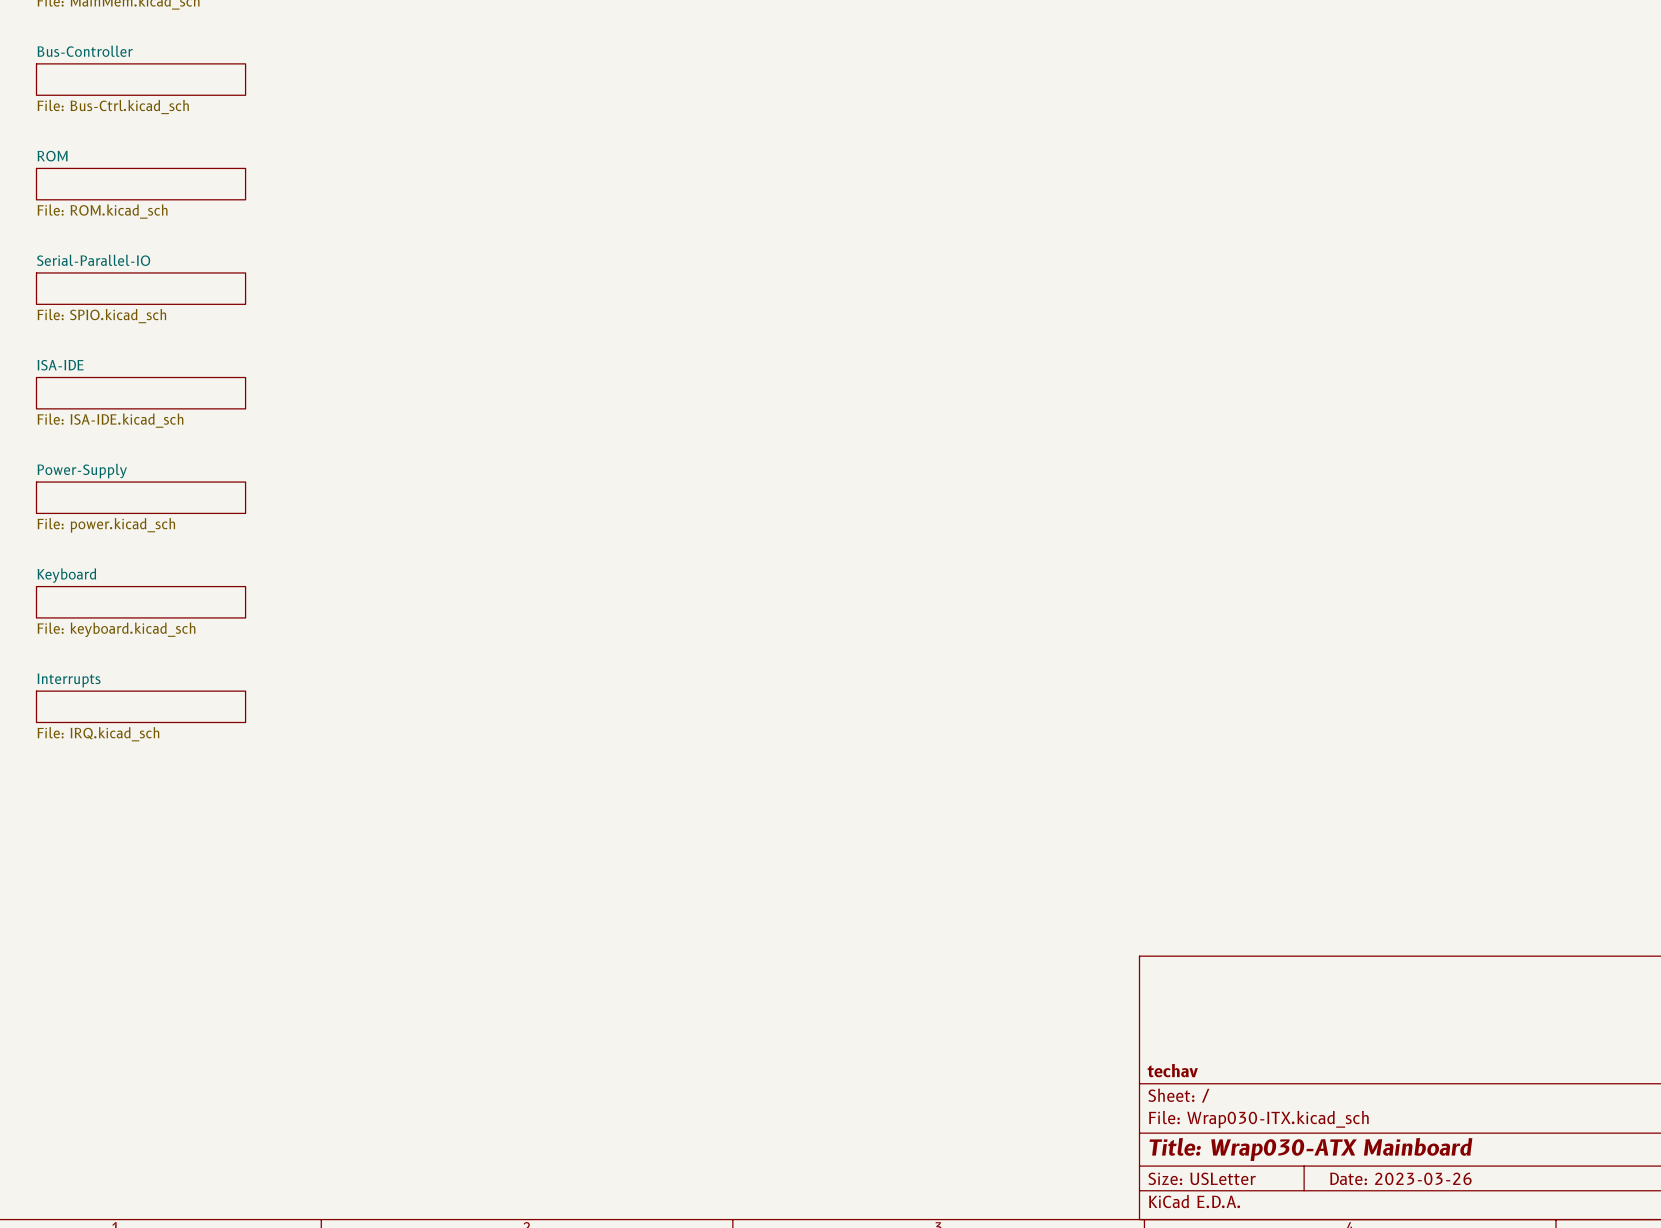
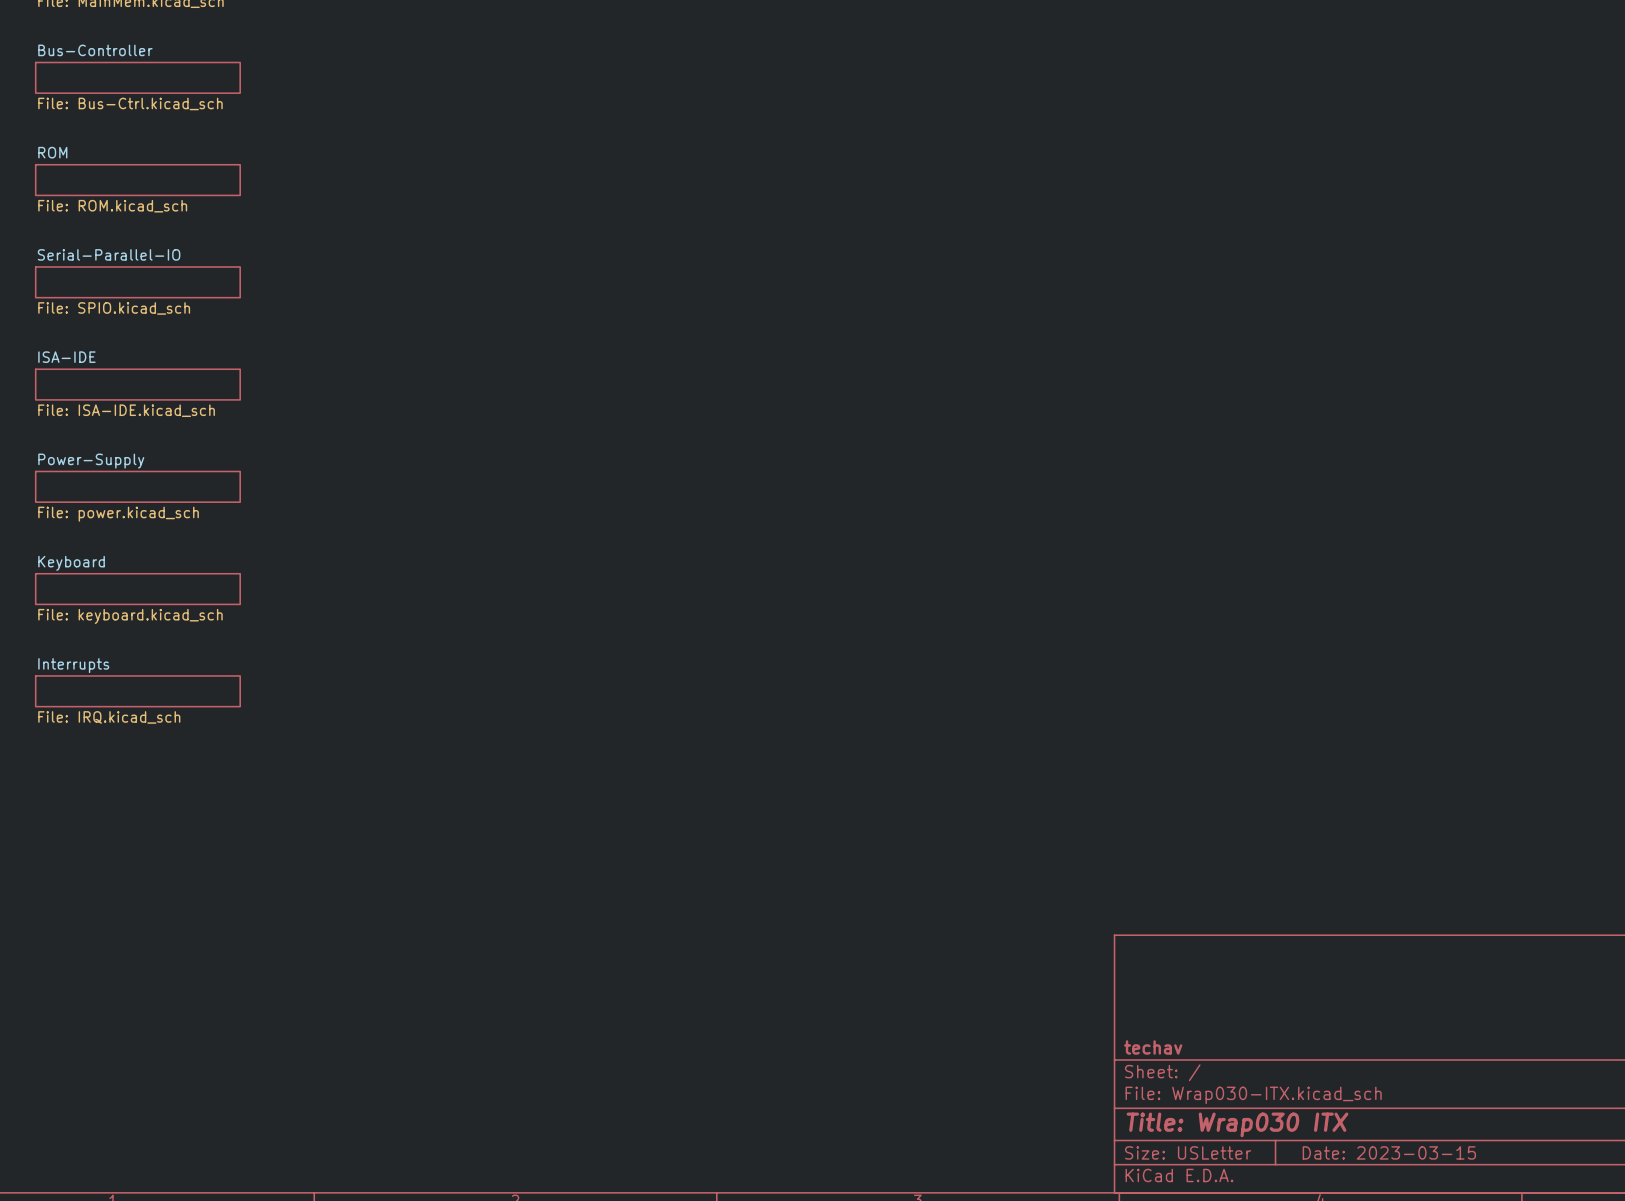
title block: Title: Wrap030-ATX Mainboard (1310, 1149) -> Title: Wrap030 ITX (1237, 1124)
title block: Date: 2023-03-26 (1400, 1178) -> Date: 2023-03-15 (1389, 1152)

